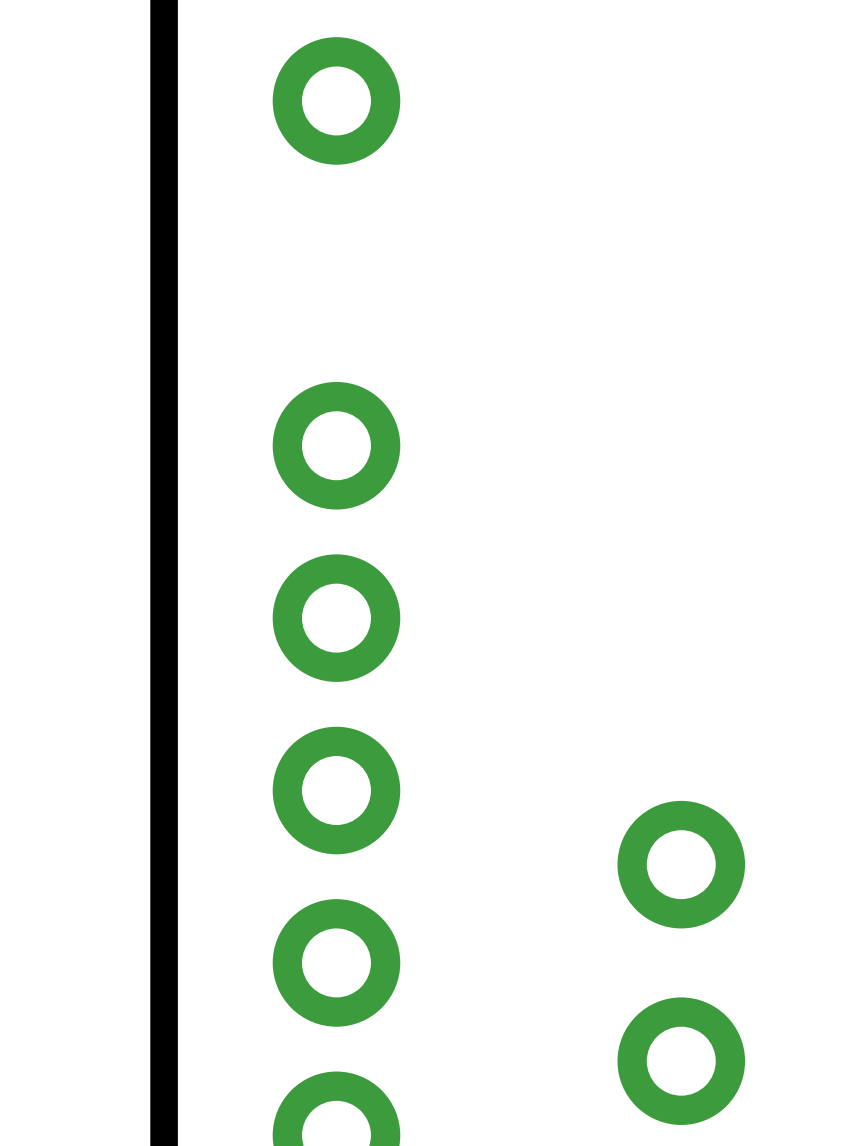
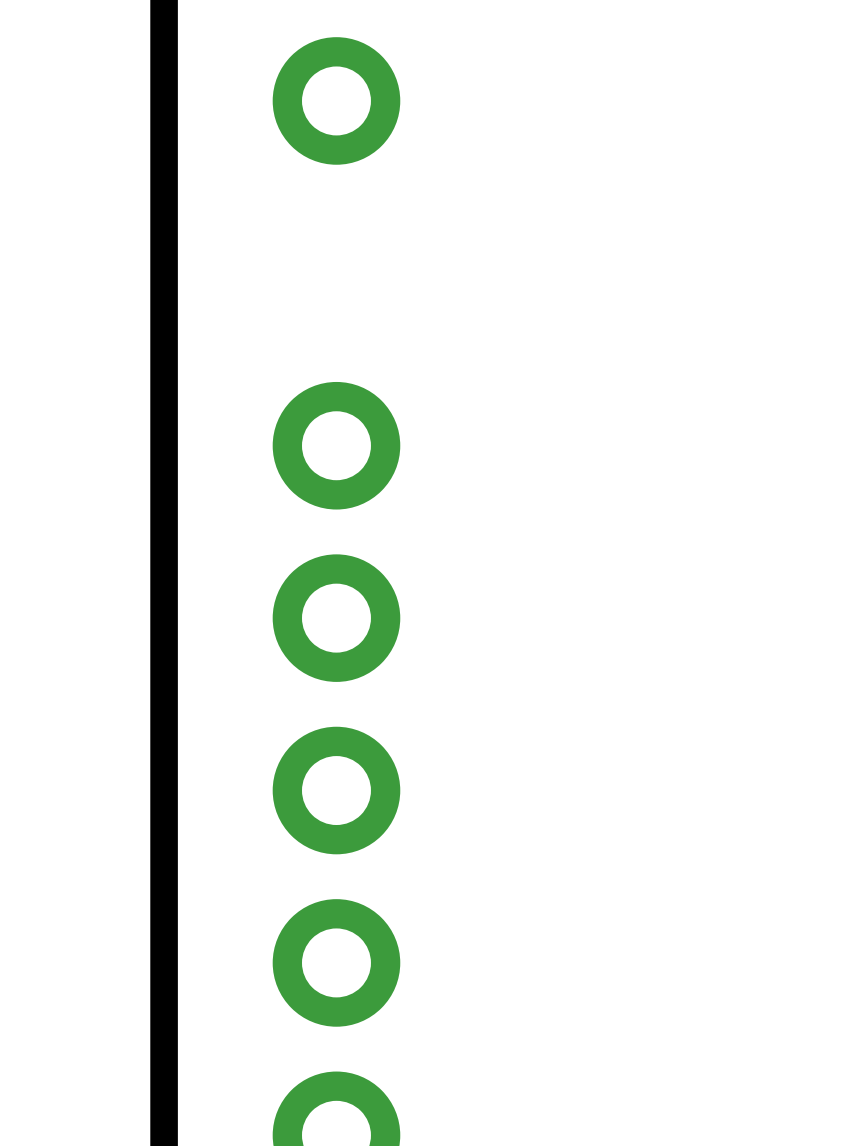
part: (681, 962) -> none

